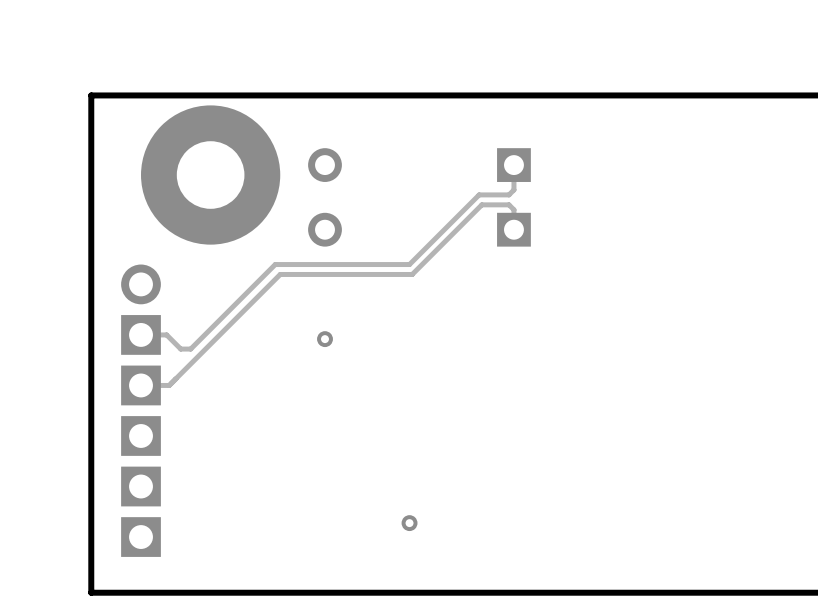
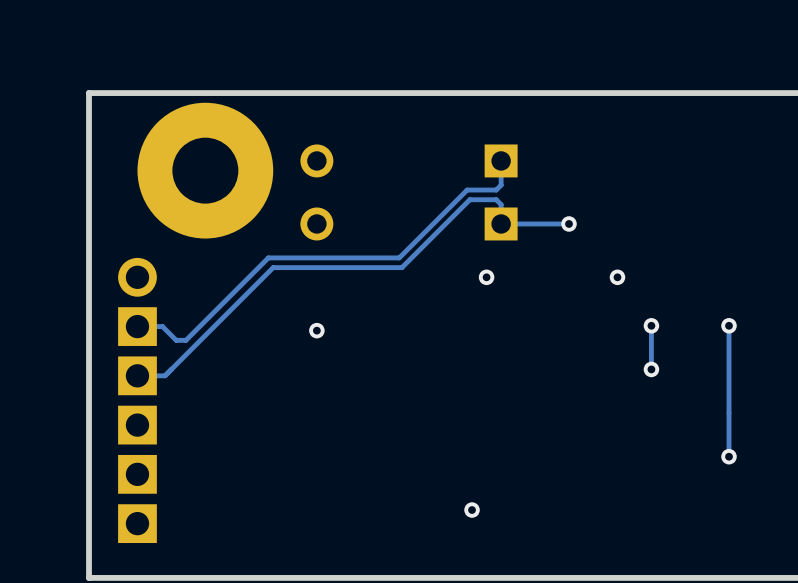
track: none -> (569, 223) (501, 223)
via: none -> (569, 223)
via: none -> (486, 277)
via: none -> (617, 277)
track: none -> (651, 325) (651, 369)
via: none -> (651, 325)
track: none -> (729, 325) (729, 456)
via: none -> (729, 325)
via: none -> (651, 369)
via: none -> (729, 456)
via position: (409, 523) -> (472, 510)

